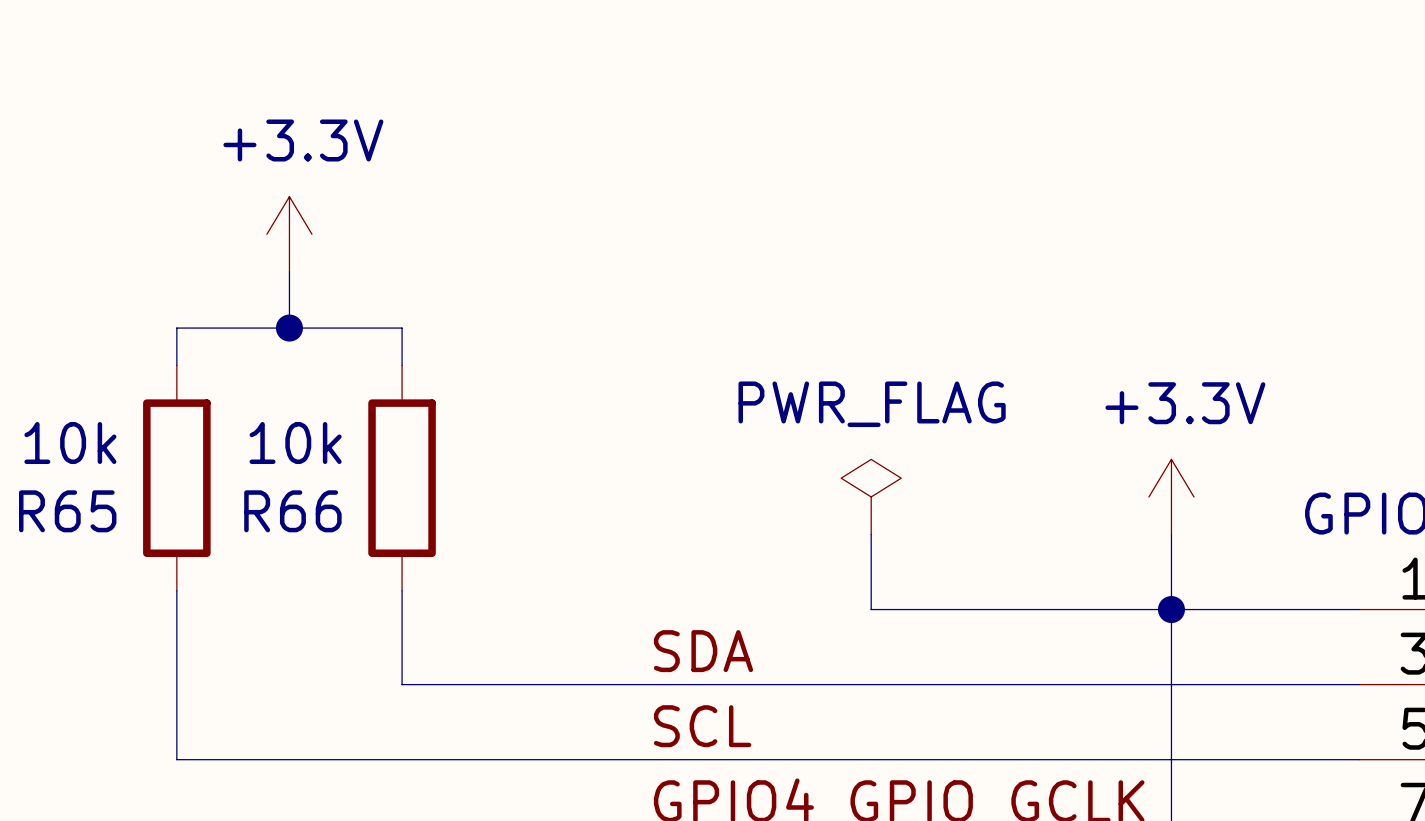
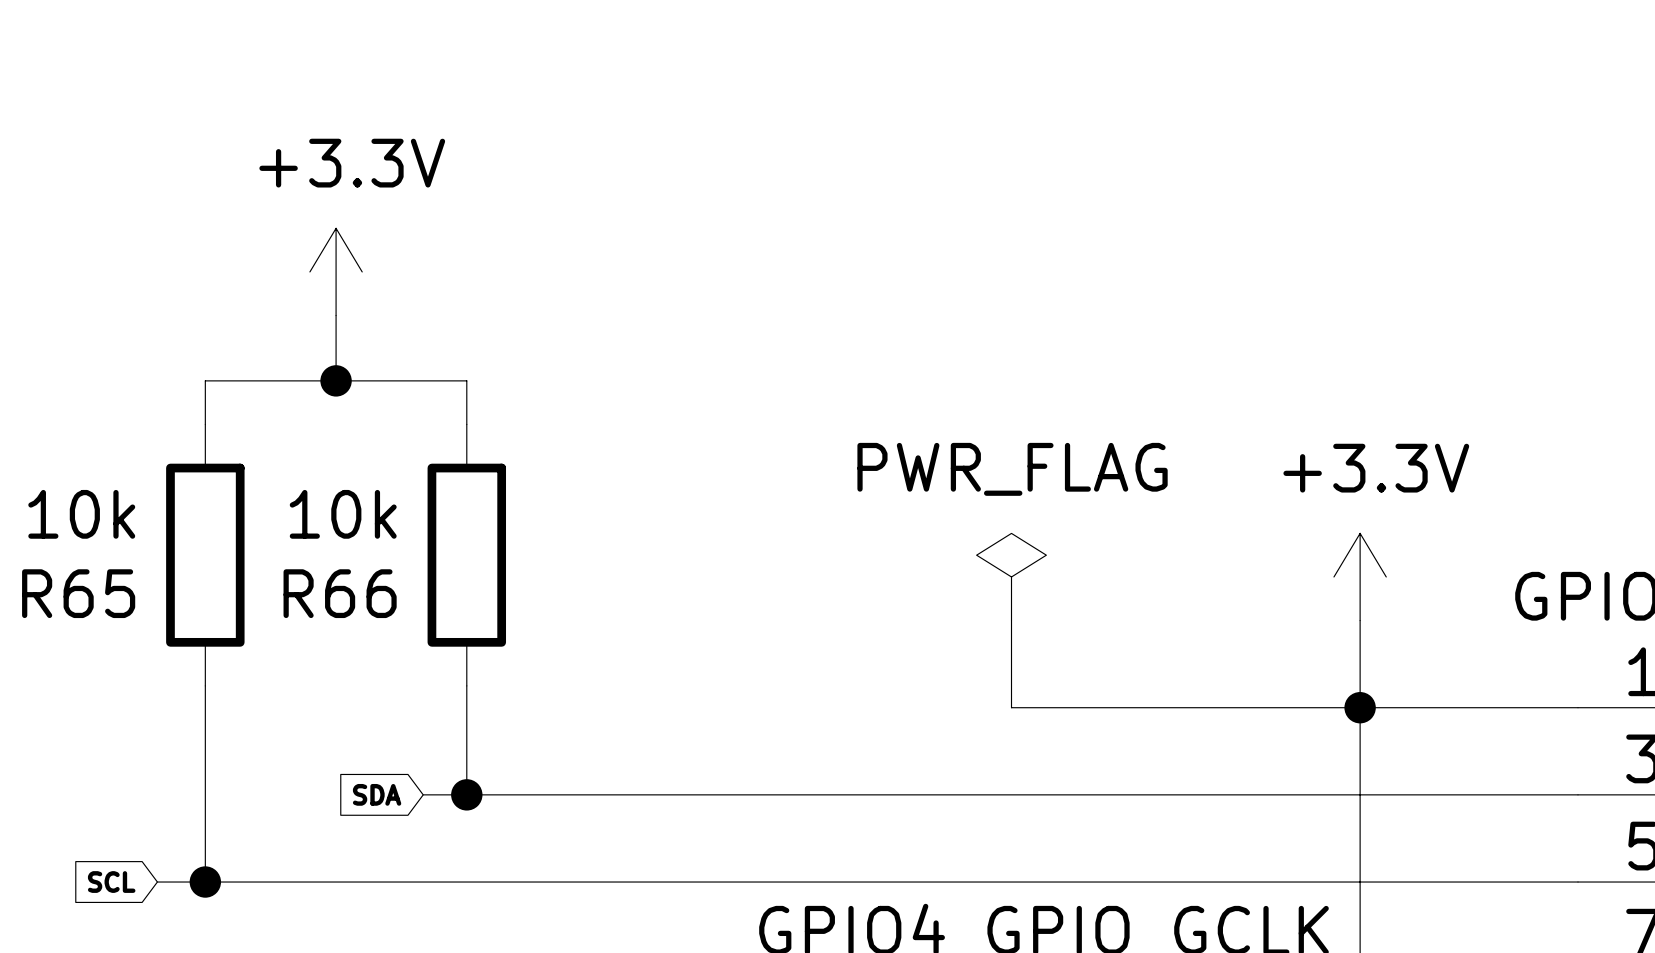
label: SDA (703, 651) -> none
global label: none -> SDA (377, 794)
wire: none -> (423, 794) (466, 794)
junction: none -> (466, 794)
label: SCL (702, 726) -> none
global label: none -> SCL (111, 882)
wire: none -> (157, 882) (205, 882)
junction: none -> (205, 882)

